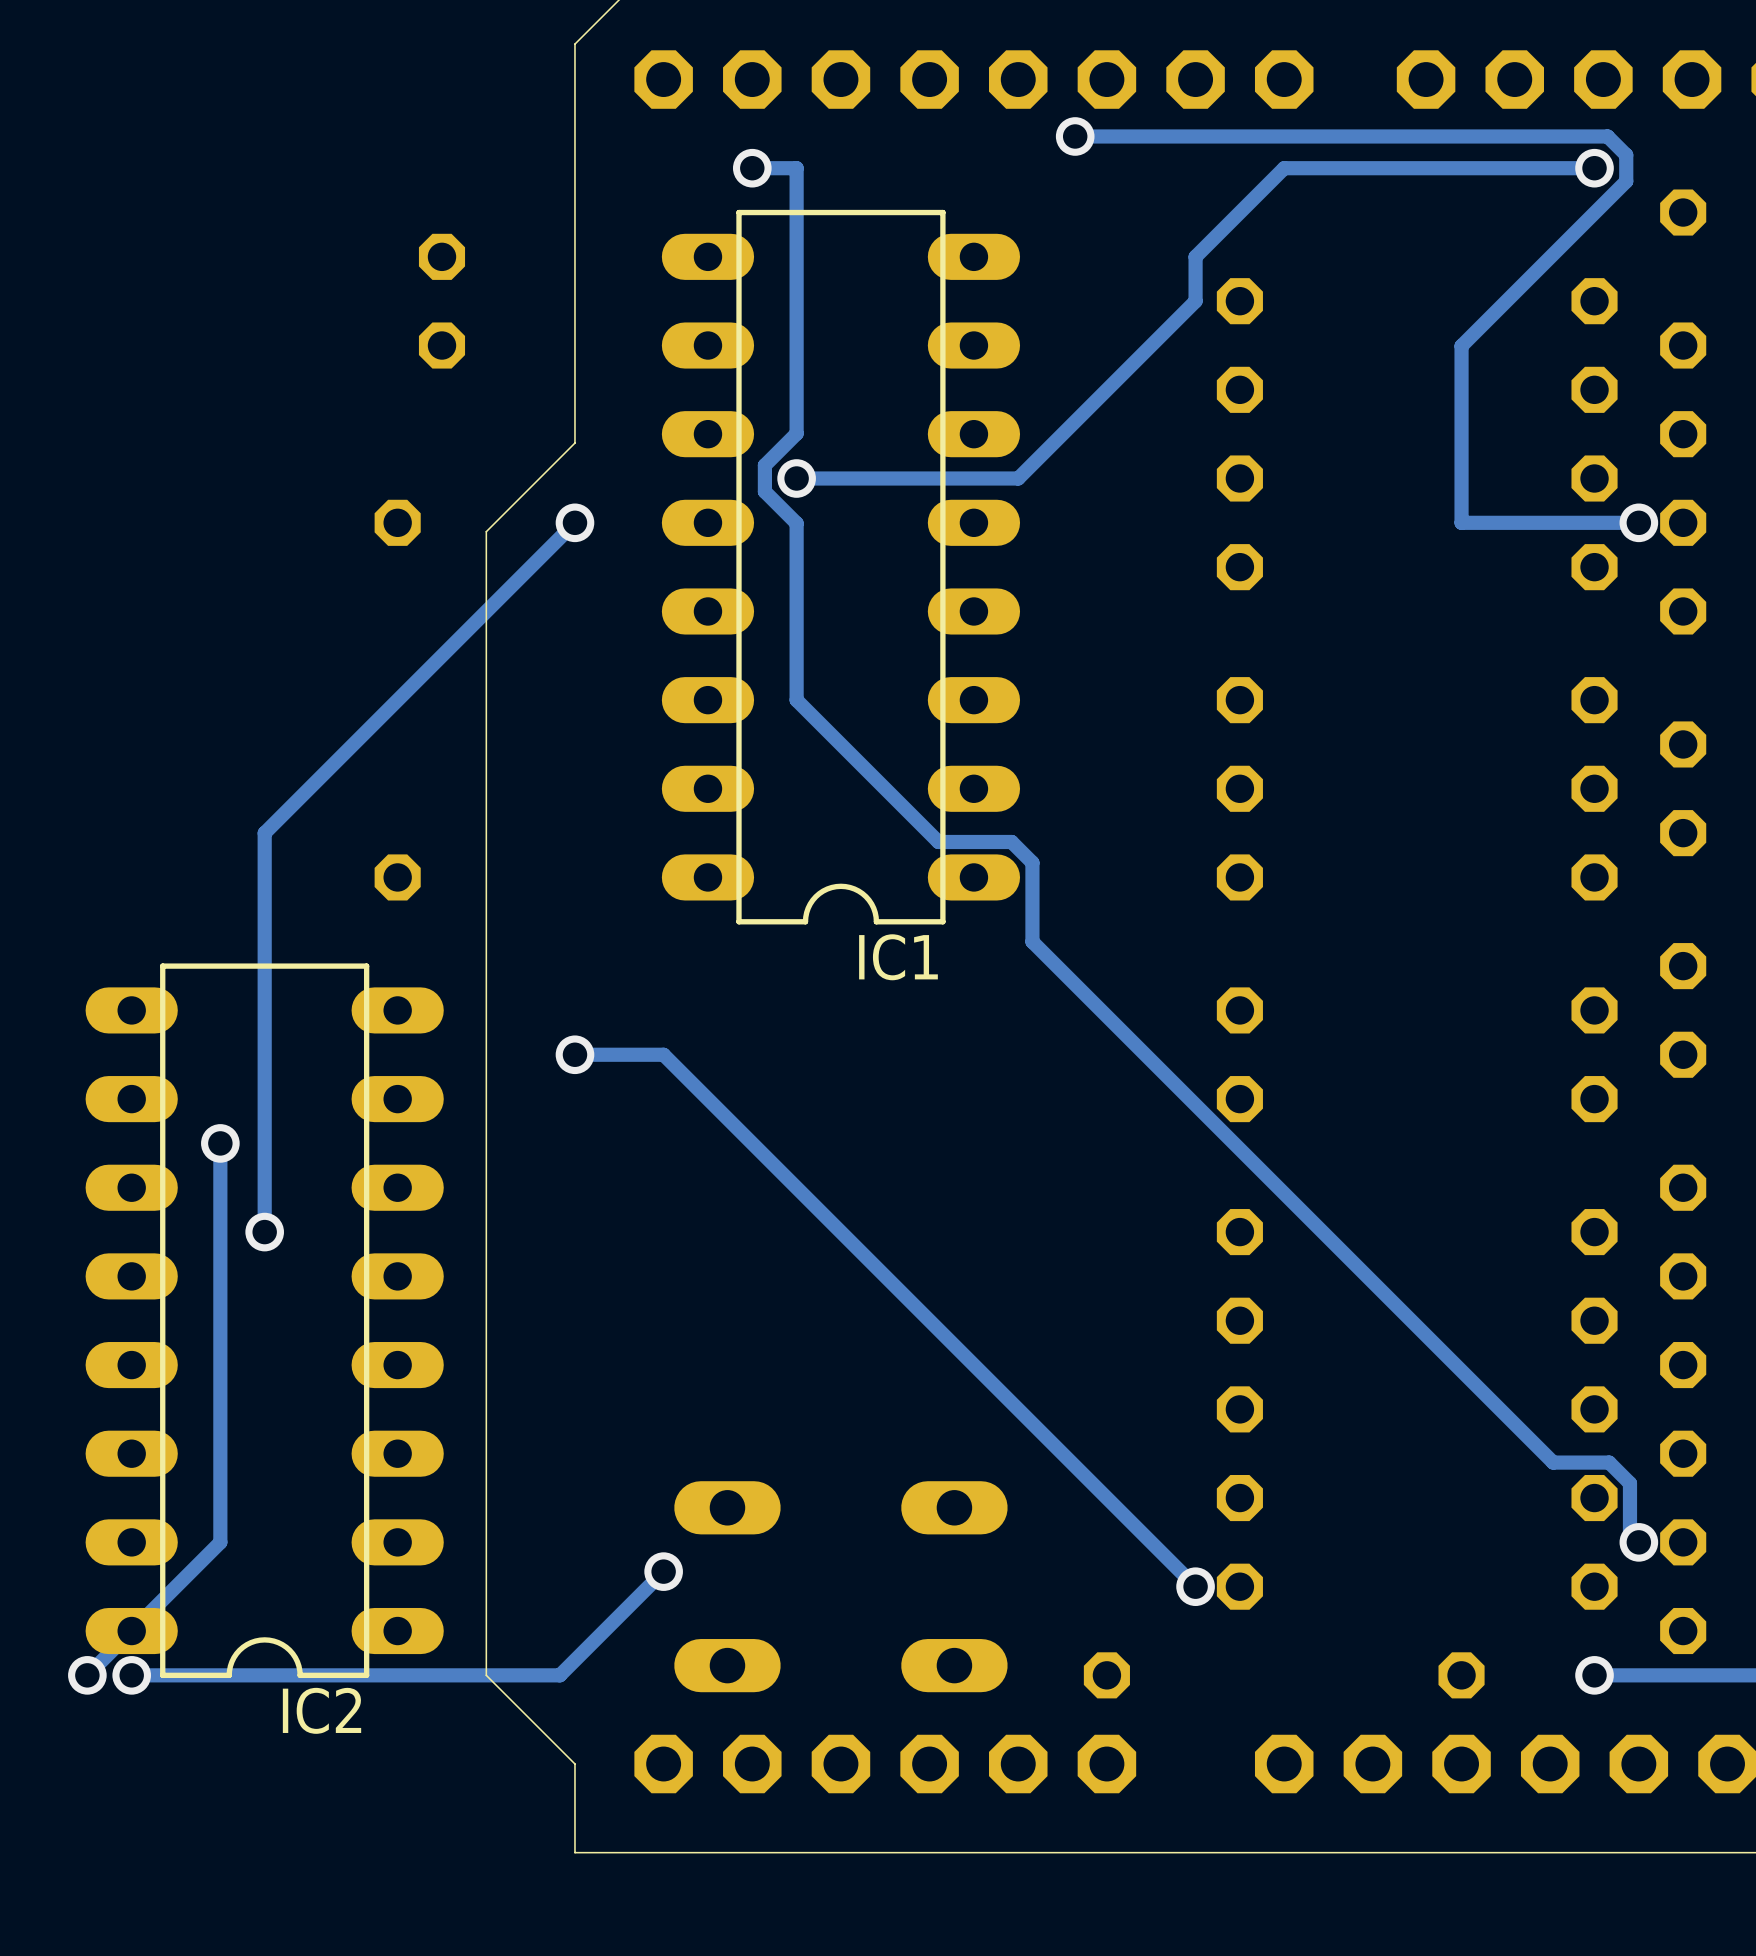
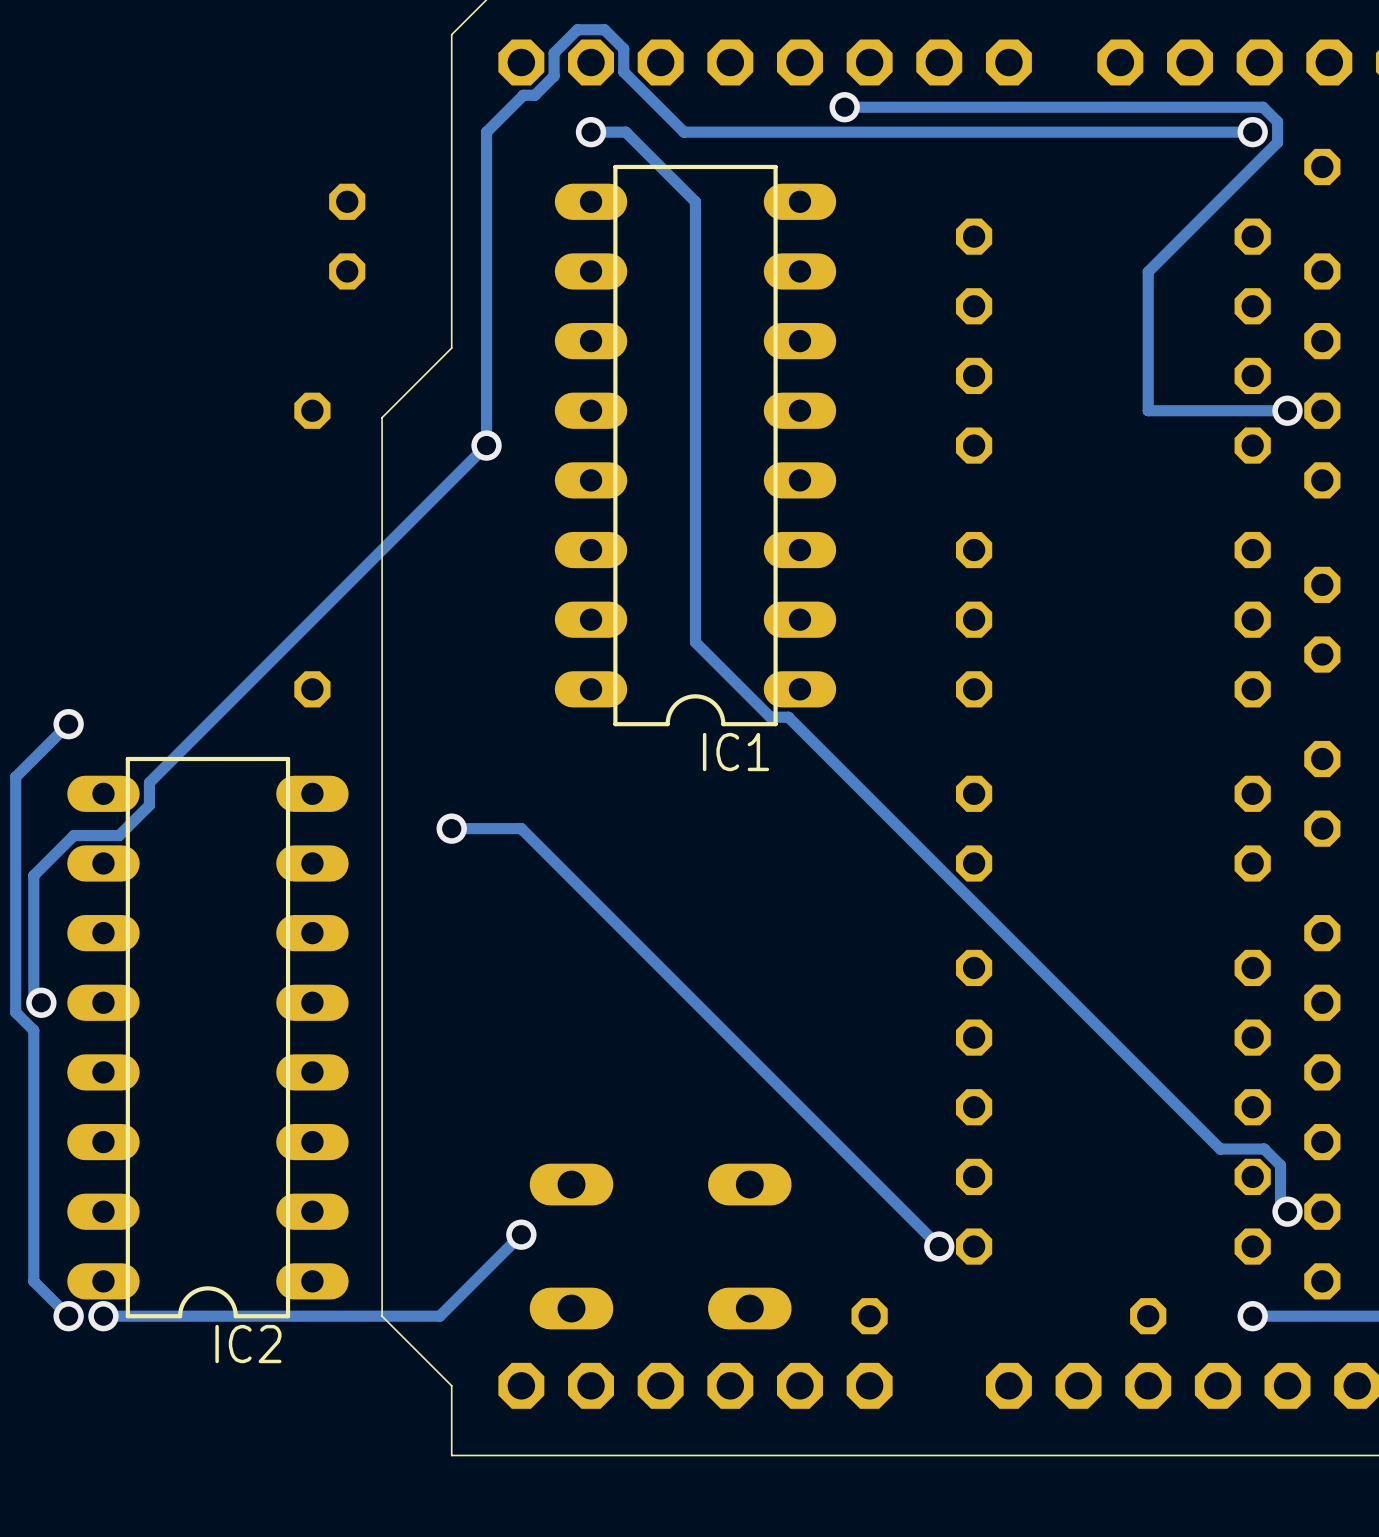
track: (796, 168) (796, 433) (764, 465) (764, 491) (796, 523) (796, 700) (938, 841) (1011, 841) (1032, 862) (1032, 941) -> (625, 132) (695, 201) (695, 642) (770, 717) (788, 717) (811, 739)
track: (1284, 168) (1195, 256) (1195, 301) (1018, 478) (796, 478) -> (1008, 132) (684, 132) (623, 71) (623, 48) (604, 29) (577, 29) (554, 53) (554, 76) (534, 95) (523, 95) (486, 132) (486, 445) (149, 782) (149, 805) (119, 835) (73, 835) (33, 875) (33, 1002) (41, 1002)
via: (796, 478) -> none
track: (574, 522) (264, 833) (264, 1232) -> none
via position: (574, 522) -> (486, 445)
IC1 position: (840, 567) -> (695, 445)
via: none -> (68, 724)
track: (220, 1143) (220, 1542) (87, 1675) -> (68, 724) (15, 777) (15, 1012) (33, 1030) (33, 1281) (68, 1316)
via: (220, 1143) -> none
via: (264, 1232) -> none
via: none -> (41, 1002)

